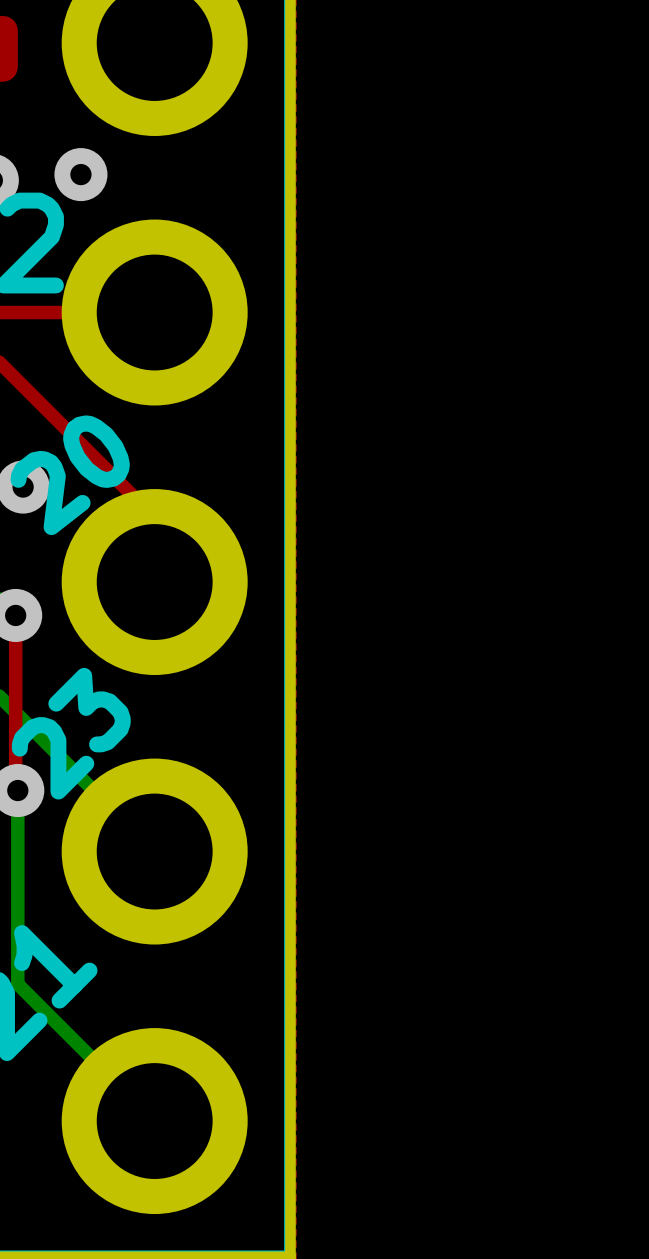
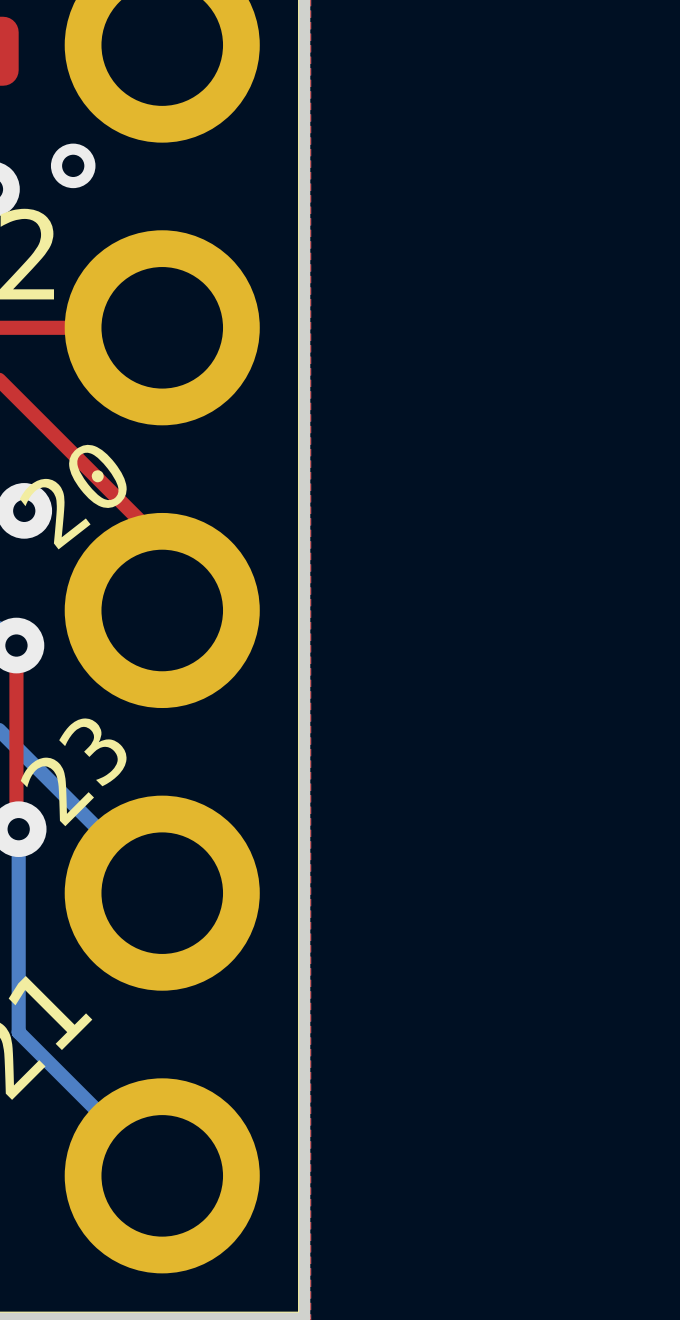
via size: [54, 148, 108, 202] -> [50, 143, 96, 189]

